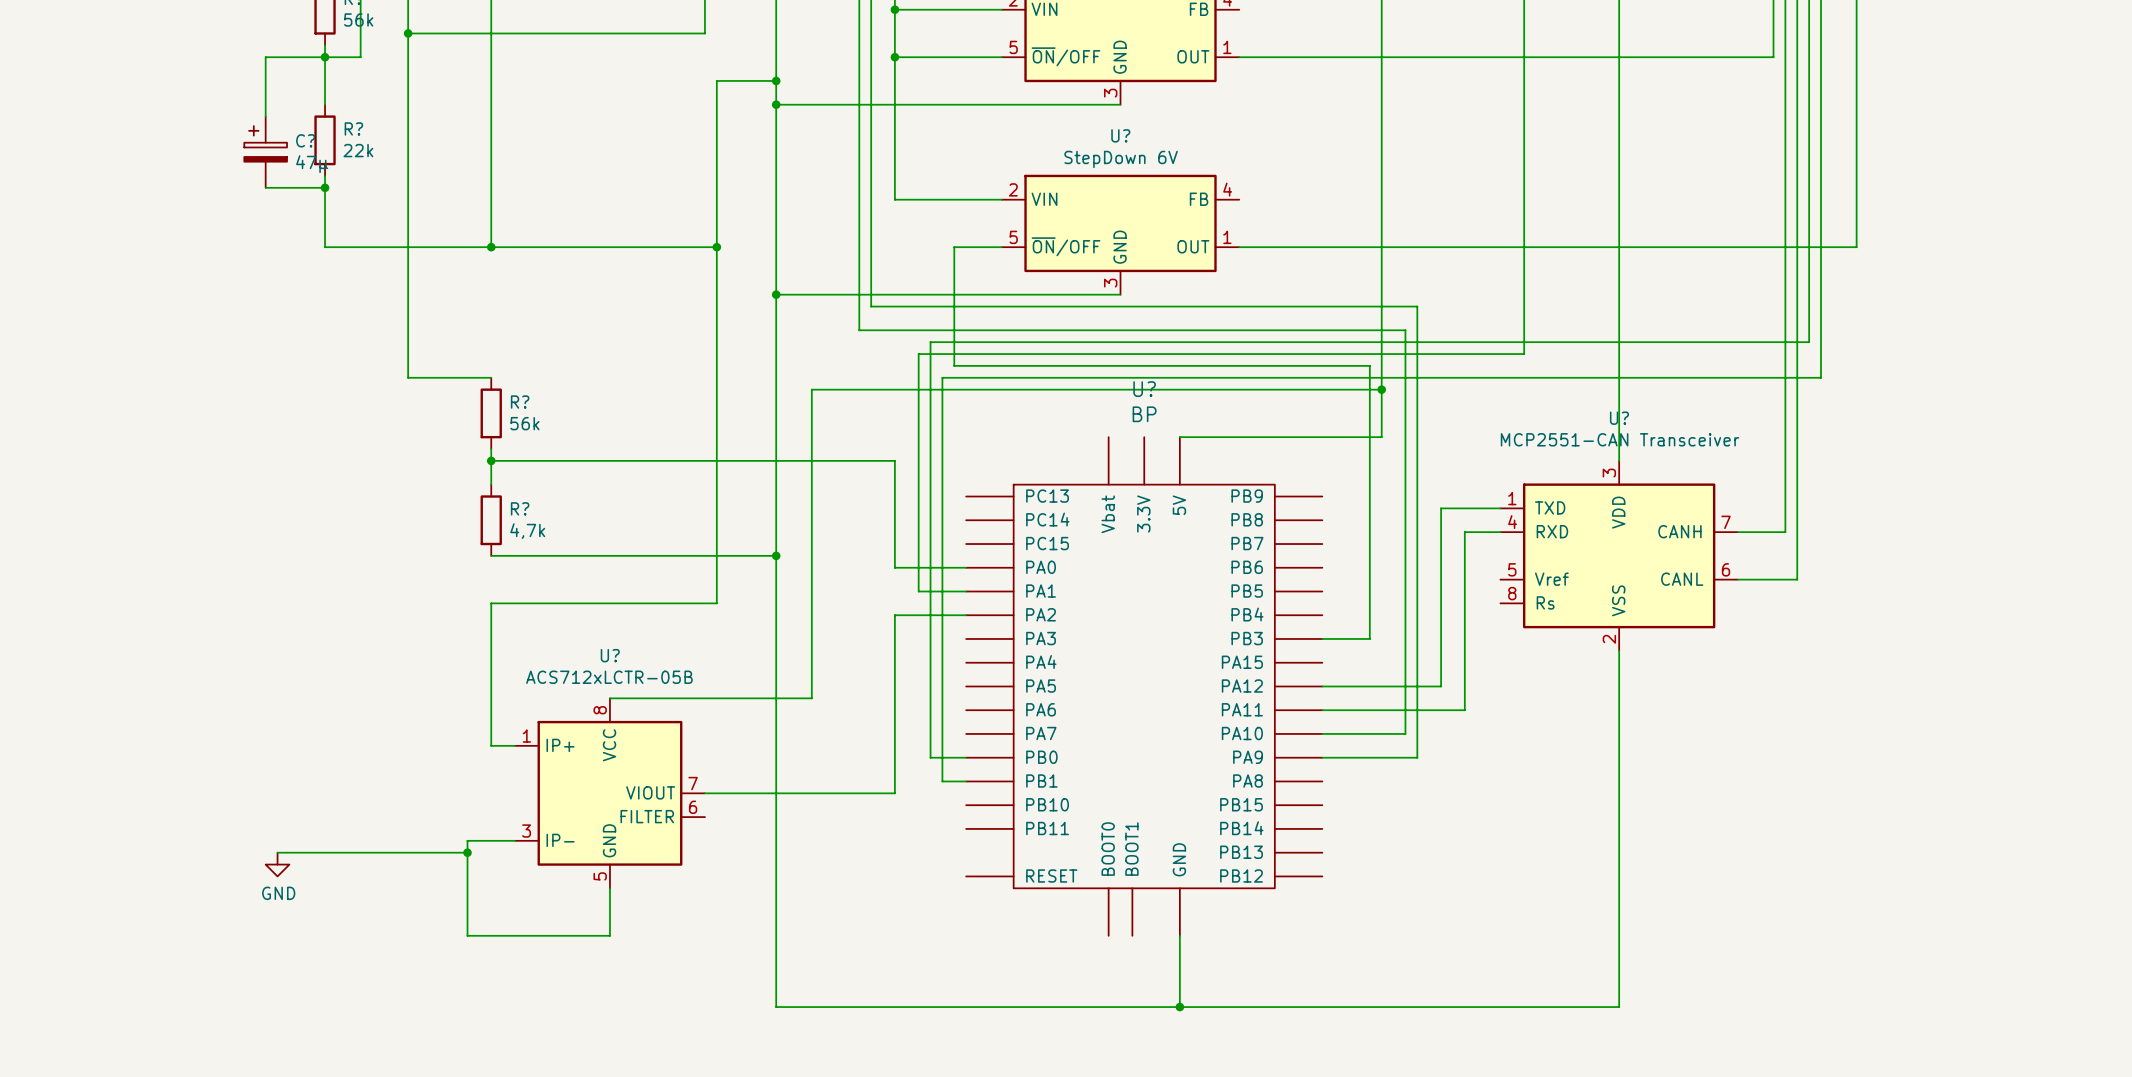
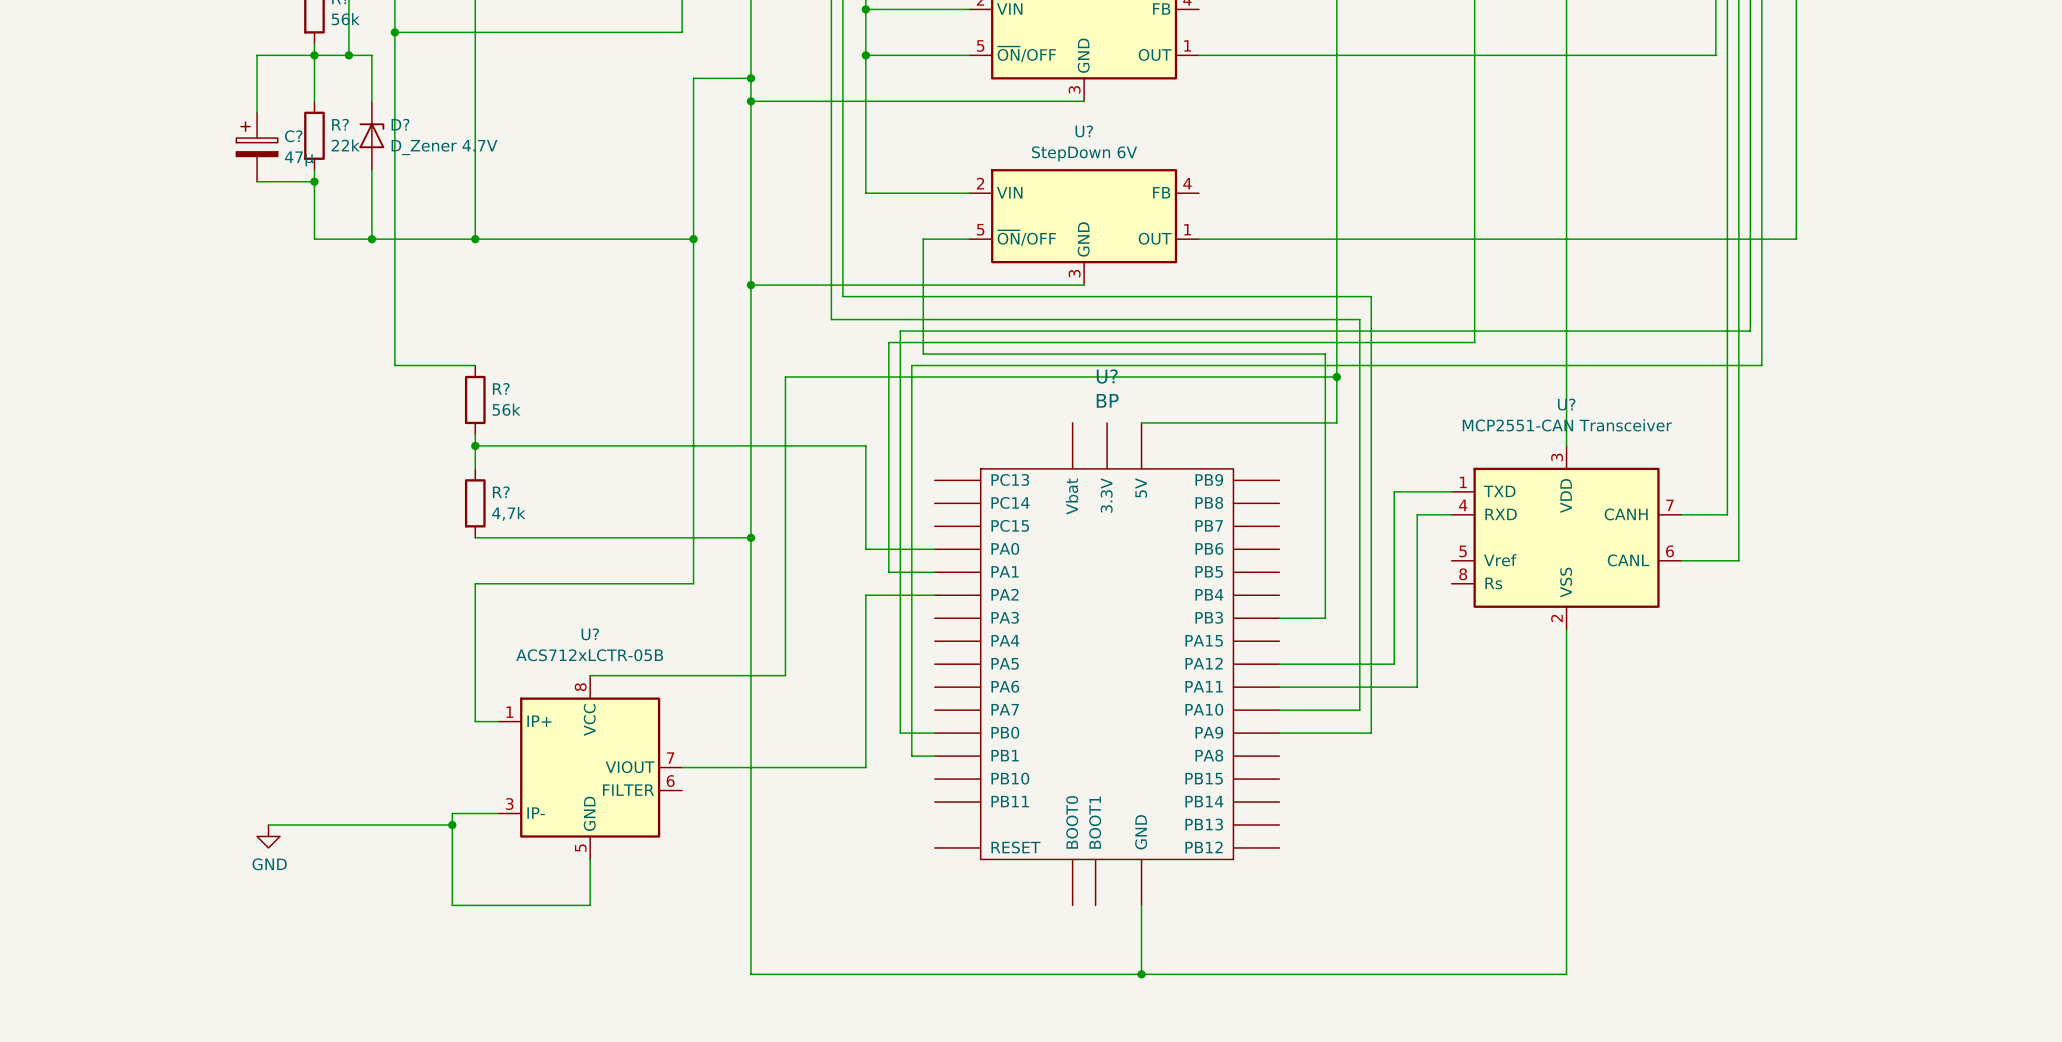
wire: none -> (348, 55) (371, 55) (371, 101)
junction: none -> (348, 55)
D?: none -> D_Zener 4.7V (371, 135)
wire: none -> (371, 170) (371, 239)
junction: none -> (371, 239)

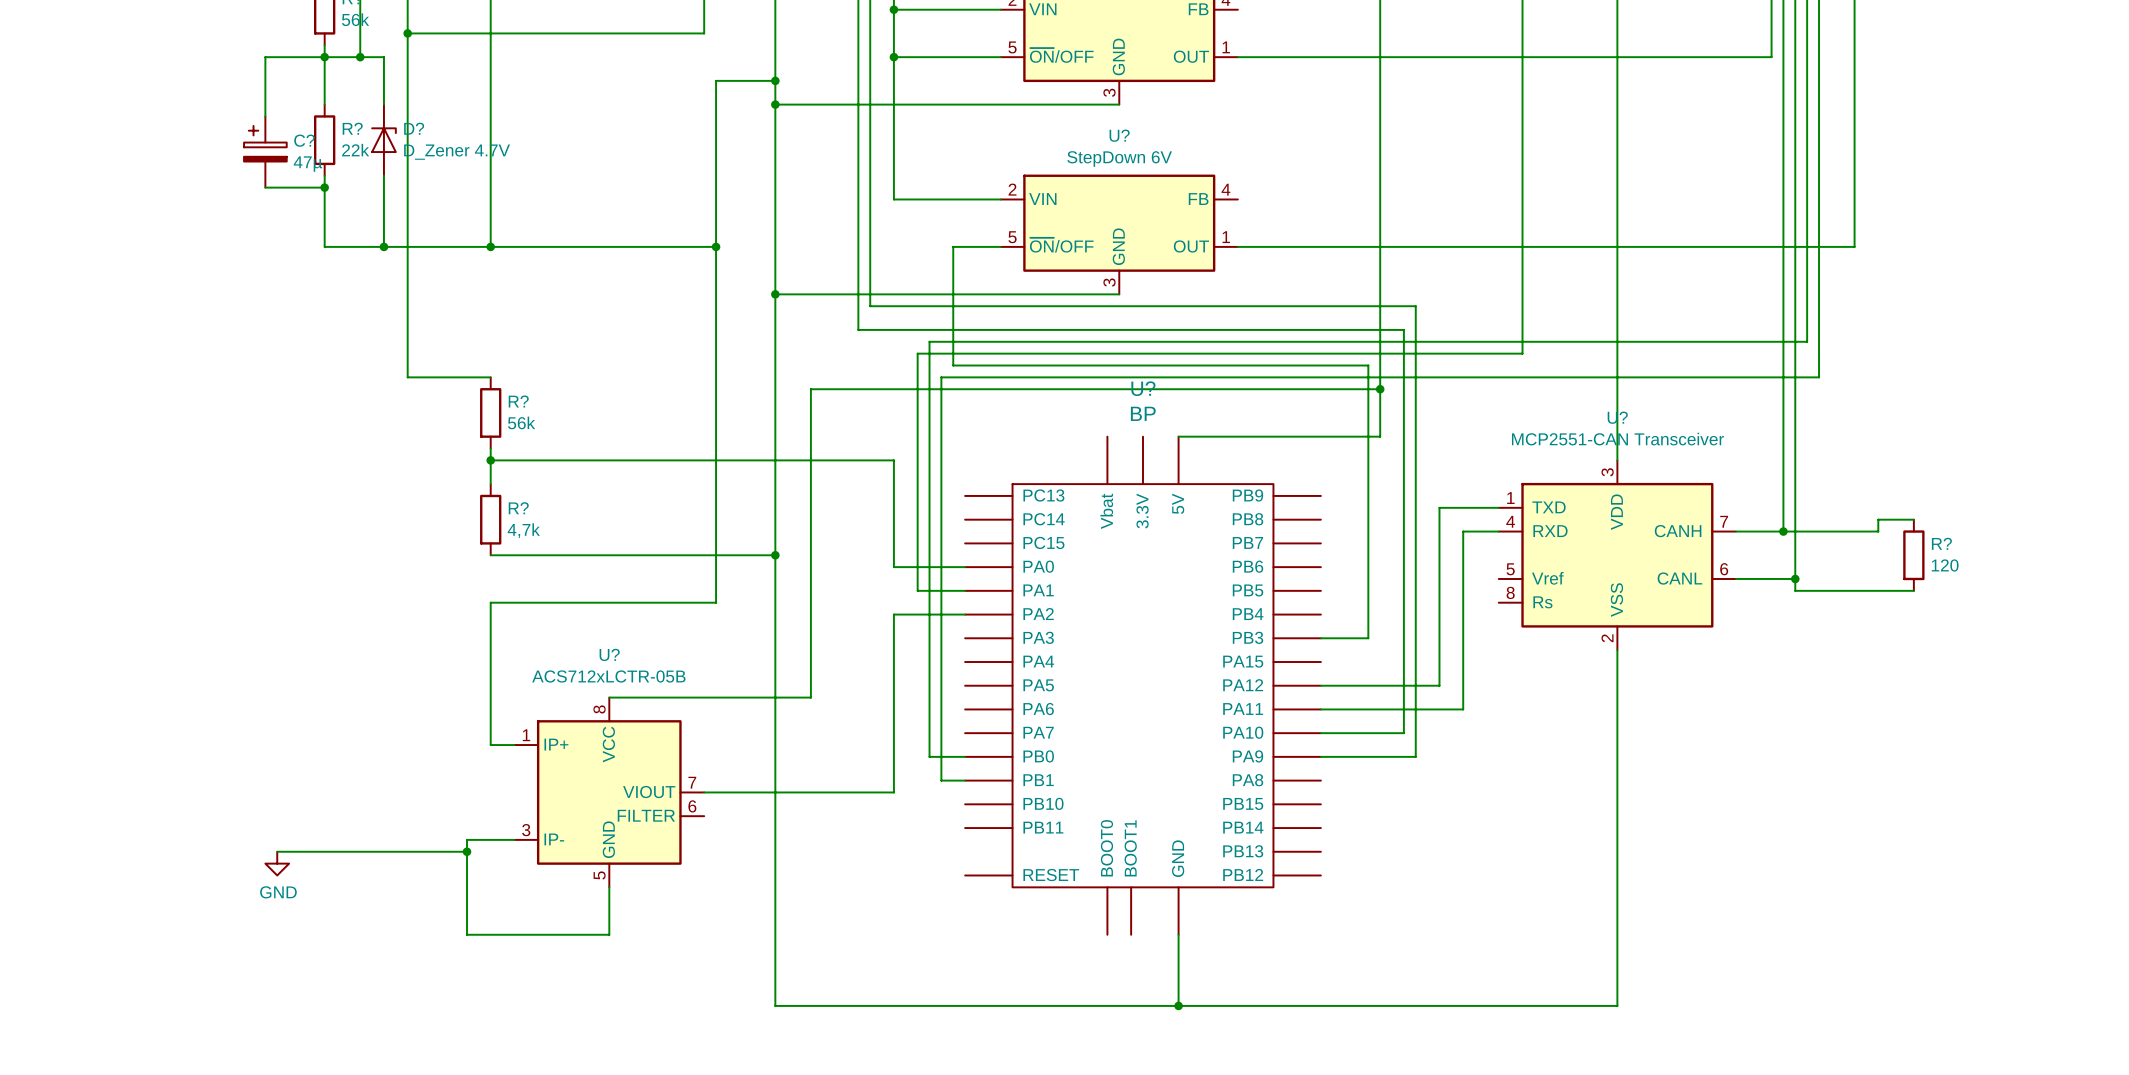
wire: none -> (1913, 519) (1878, 519) (1878, 531) (1783, 531)
junction: none -> (1783, 531)
R?: none -> 120 (1913, 555)
wire: none -> (1795, 578) (1795, 590) (1913, 590)
junction: none -> (1795, 578)

